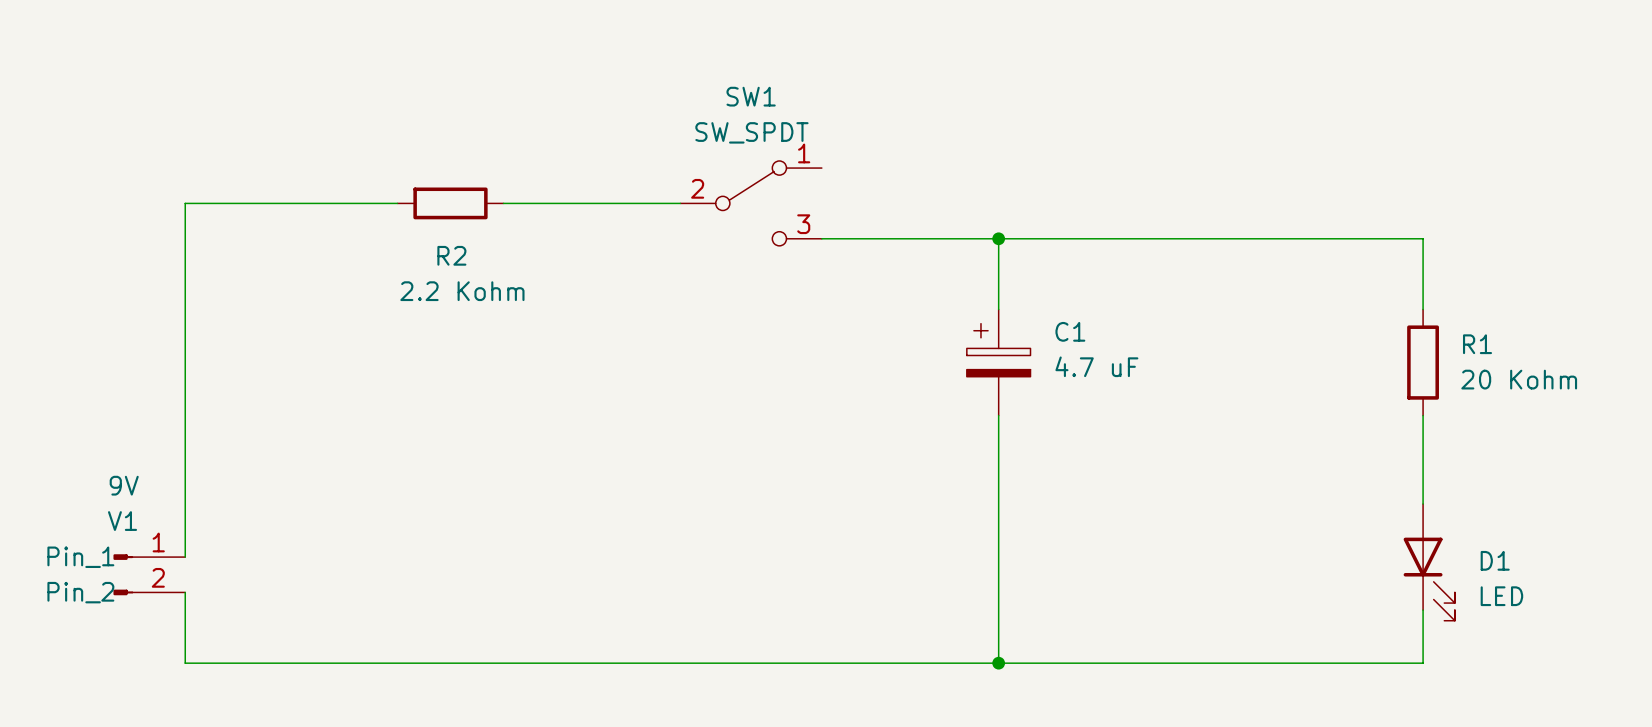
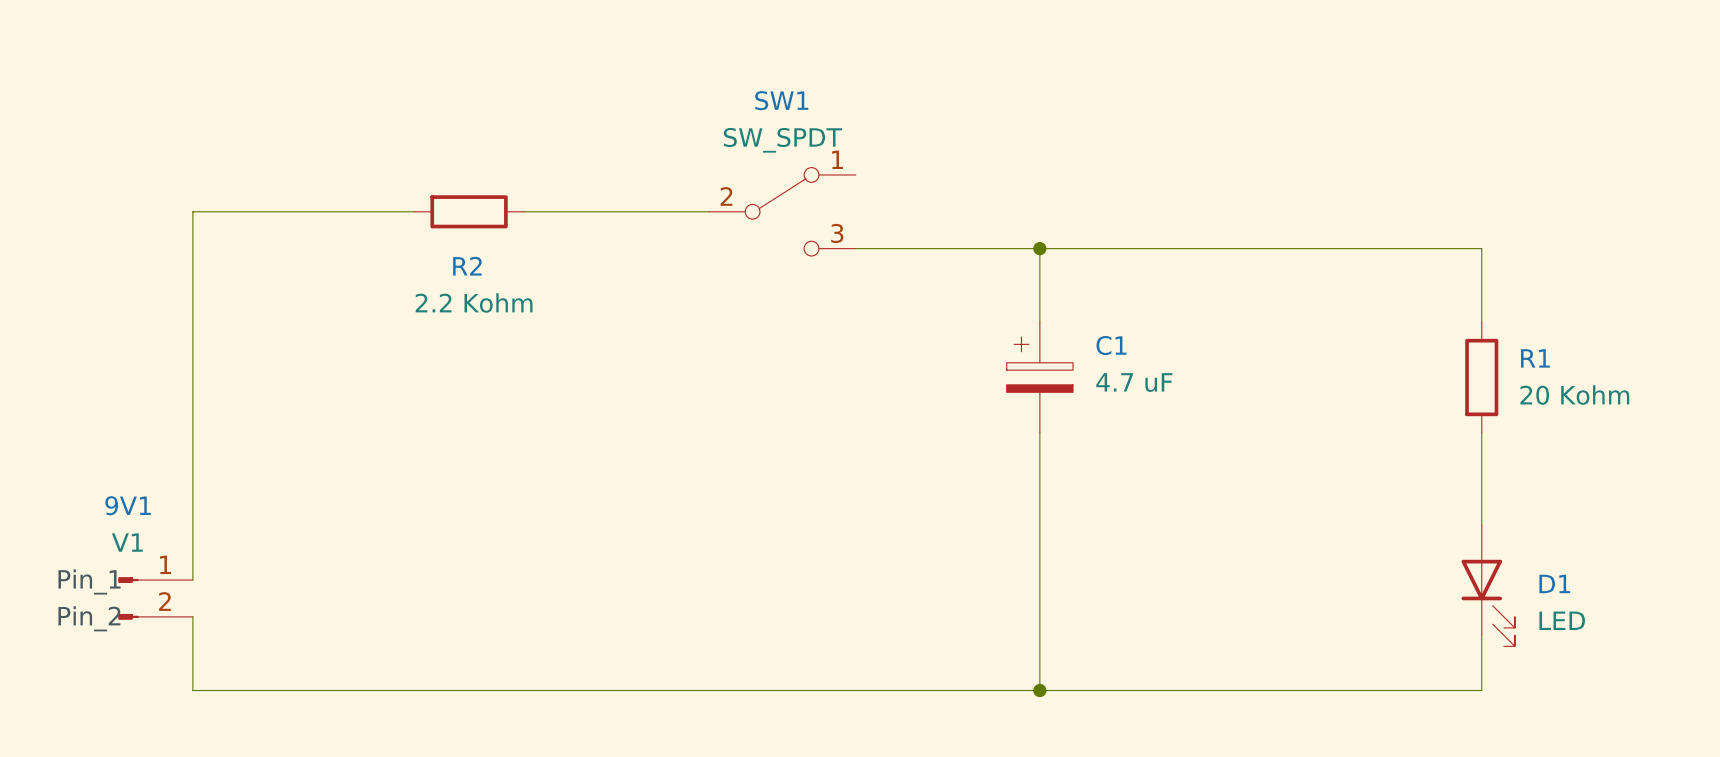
9V name: 9V (124, 485) -> 9V1 (128, 505)

